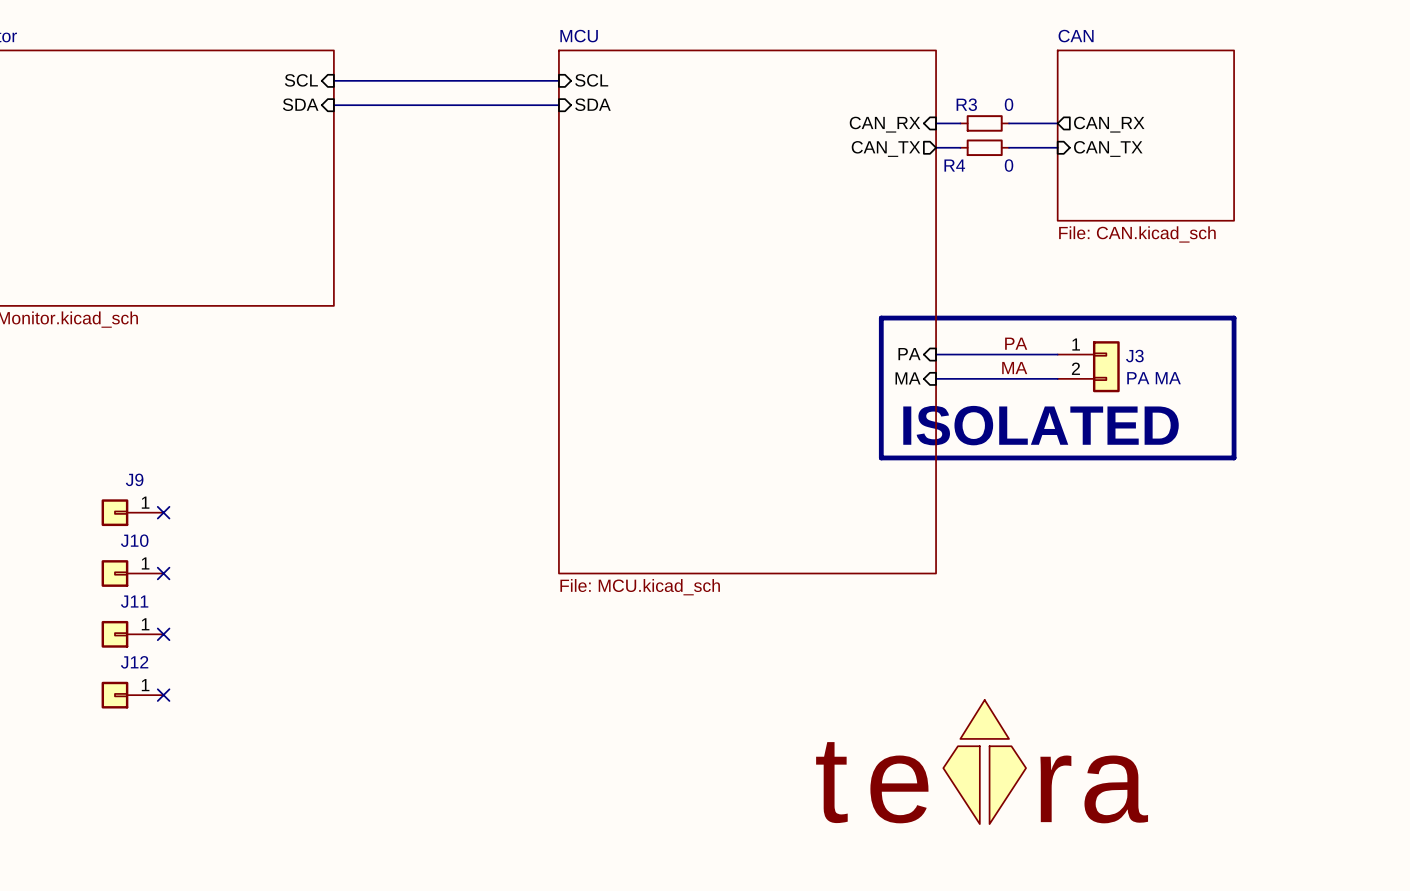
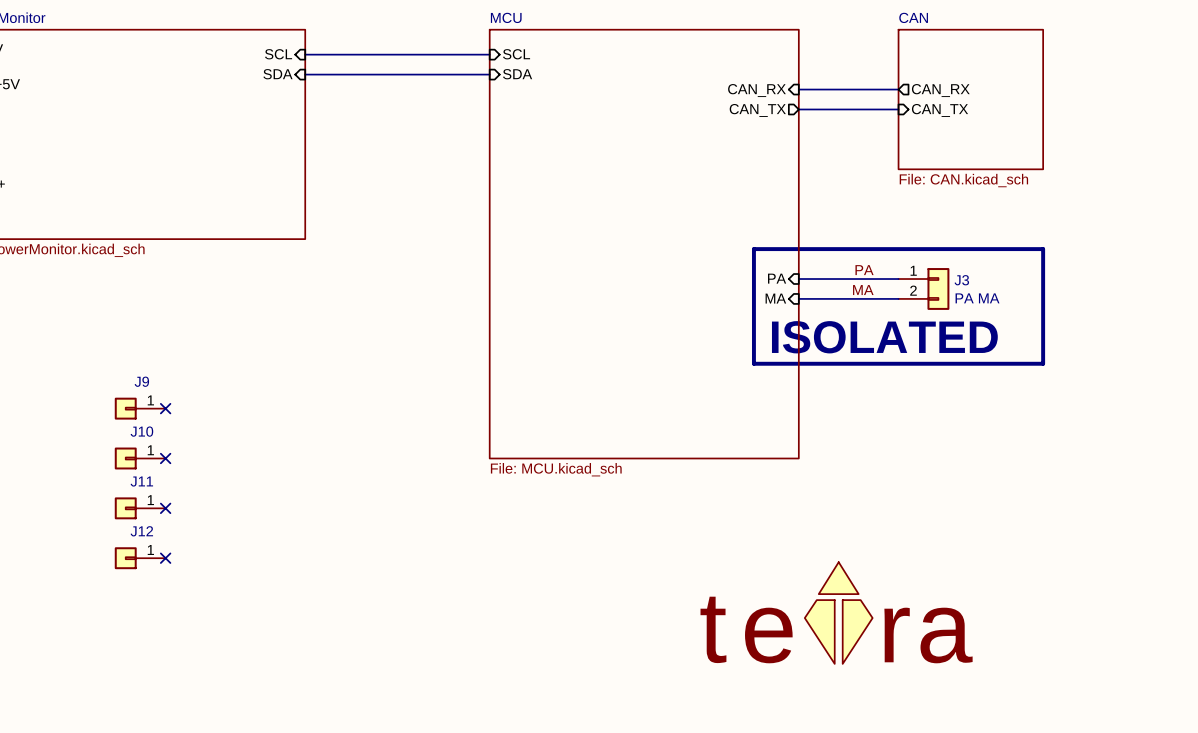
wire: none -> (818, 89) (858, 89)
R3: 0 (984, 123) -> none
wire: none -> (818, 109) (858, 109)
R4: 0 (984, 147) -> none

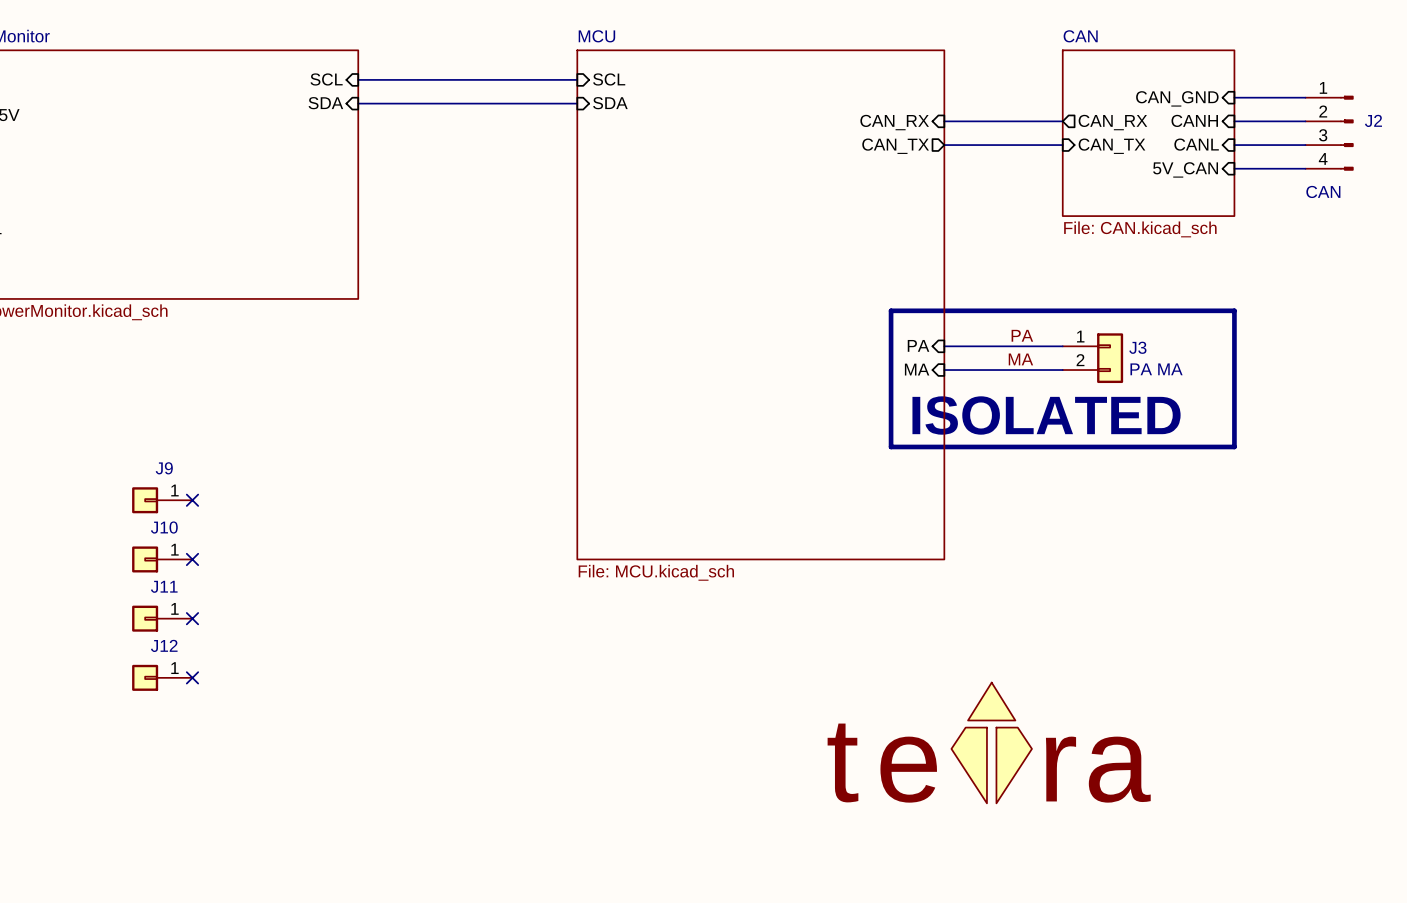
wire: none -> (1234, 97) (1305, 97)
sheet pin: none -> CAN_GND (1177, 98)
sheet pin: none -> CANH (1194, 120)
wire: none -> (1234, 121) (1305, 121)
J2: none -> CAN (1329, 133)
sheet pin: none -> CANL (1196, 144)
wire: none -> (1234, 145) (1305, 145)
wire: none -> (1234, 168) (1305, 168)
sheet pin: none -> 5V_CAN (1185, 169)

